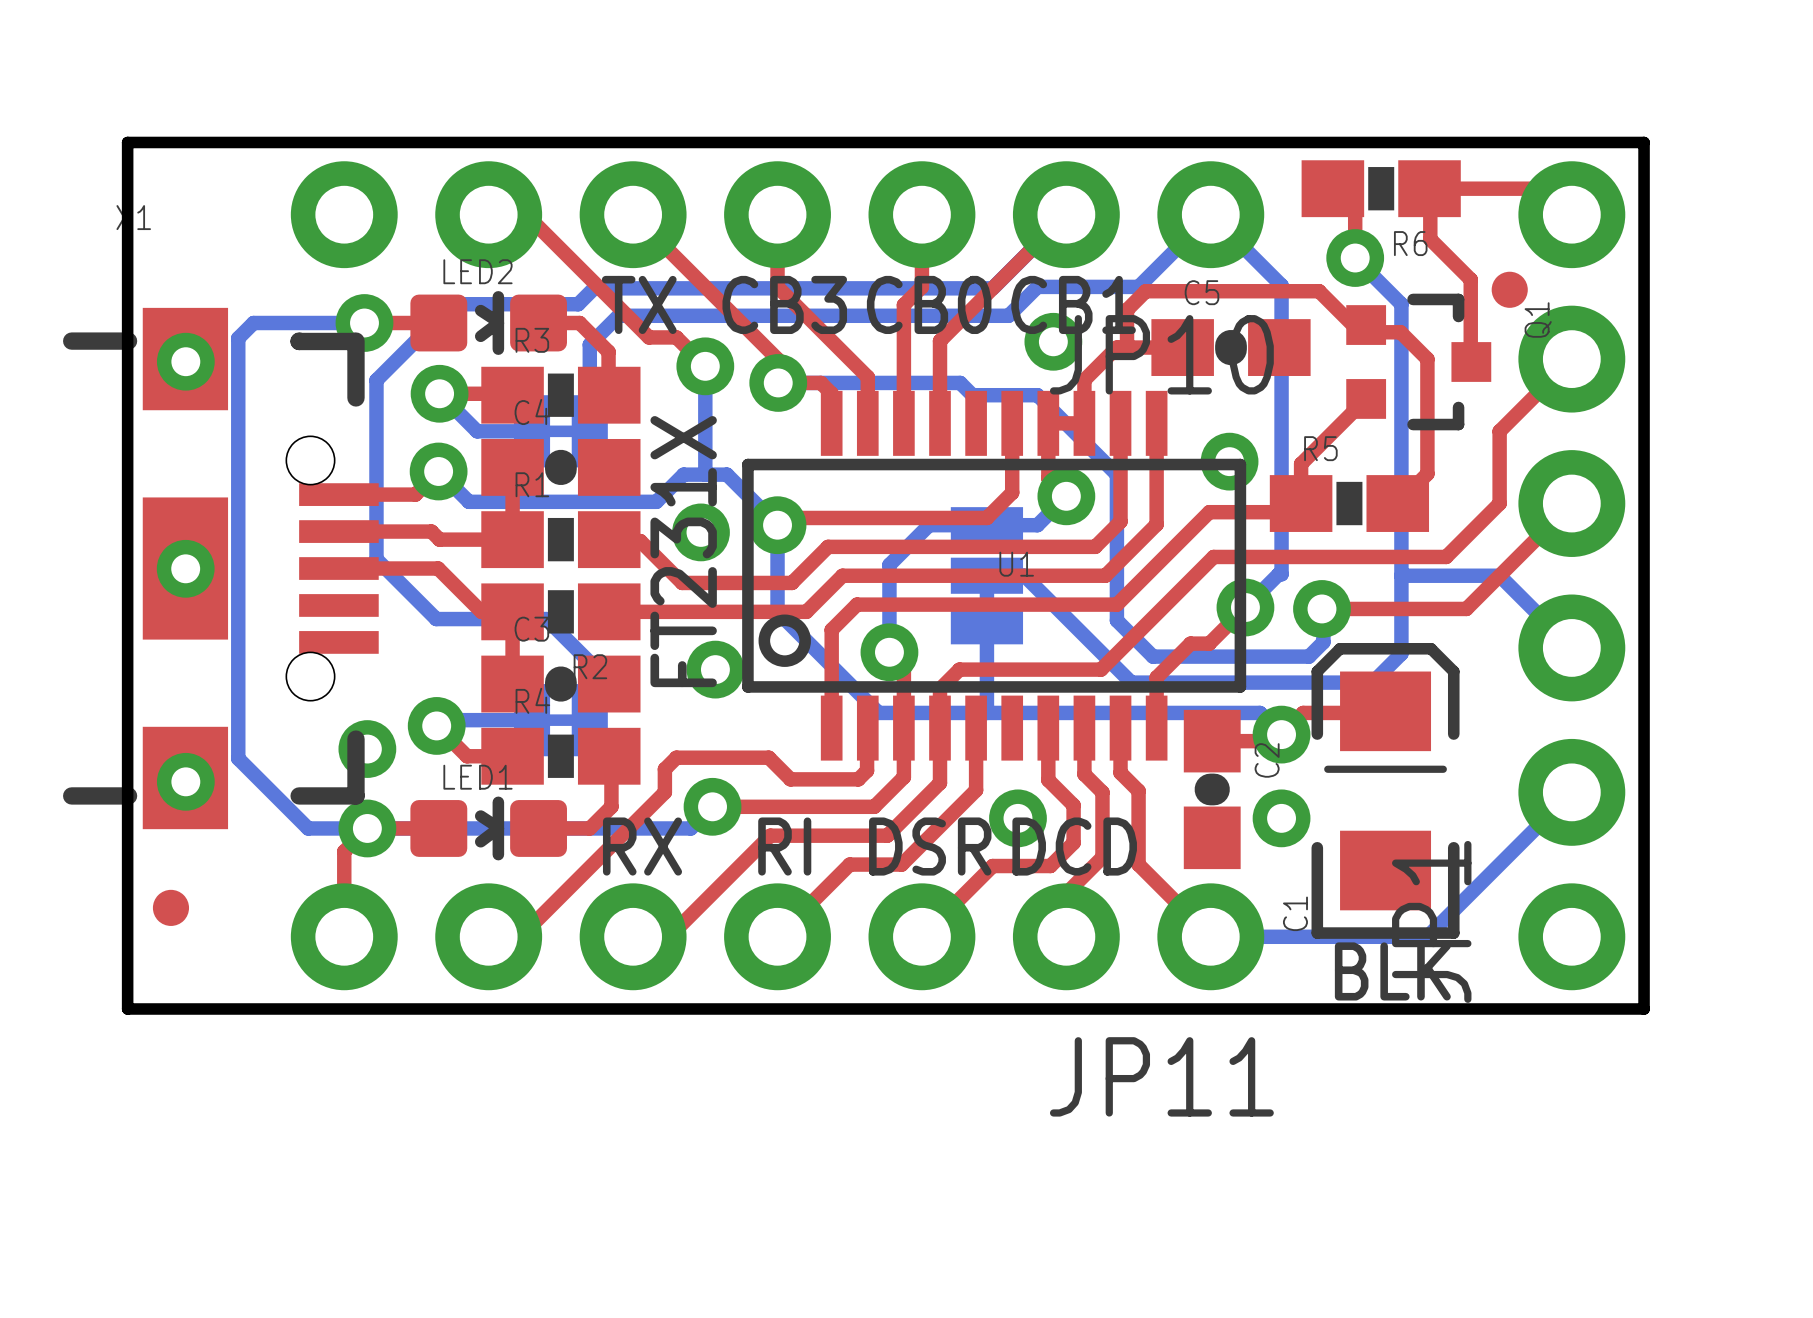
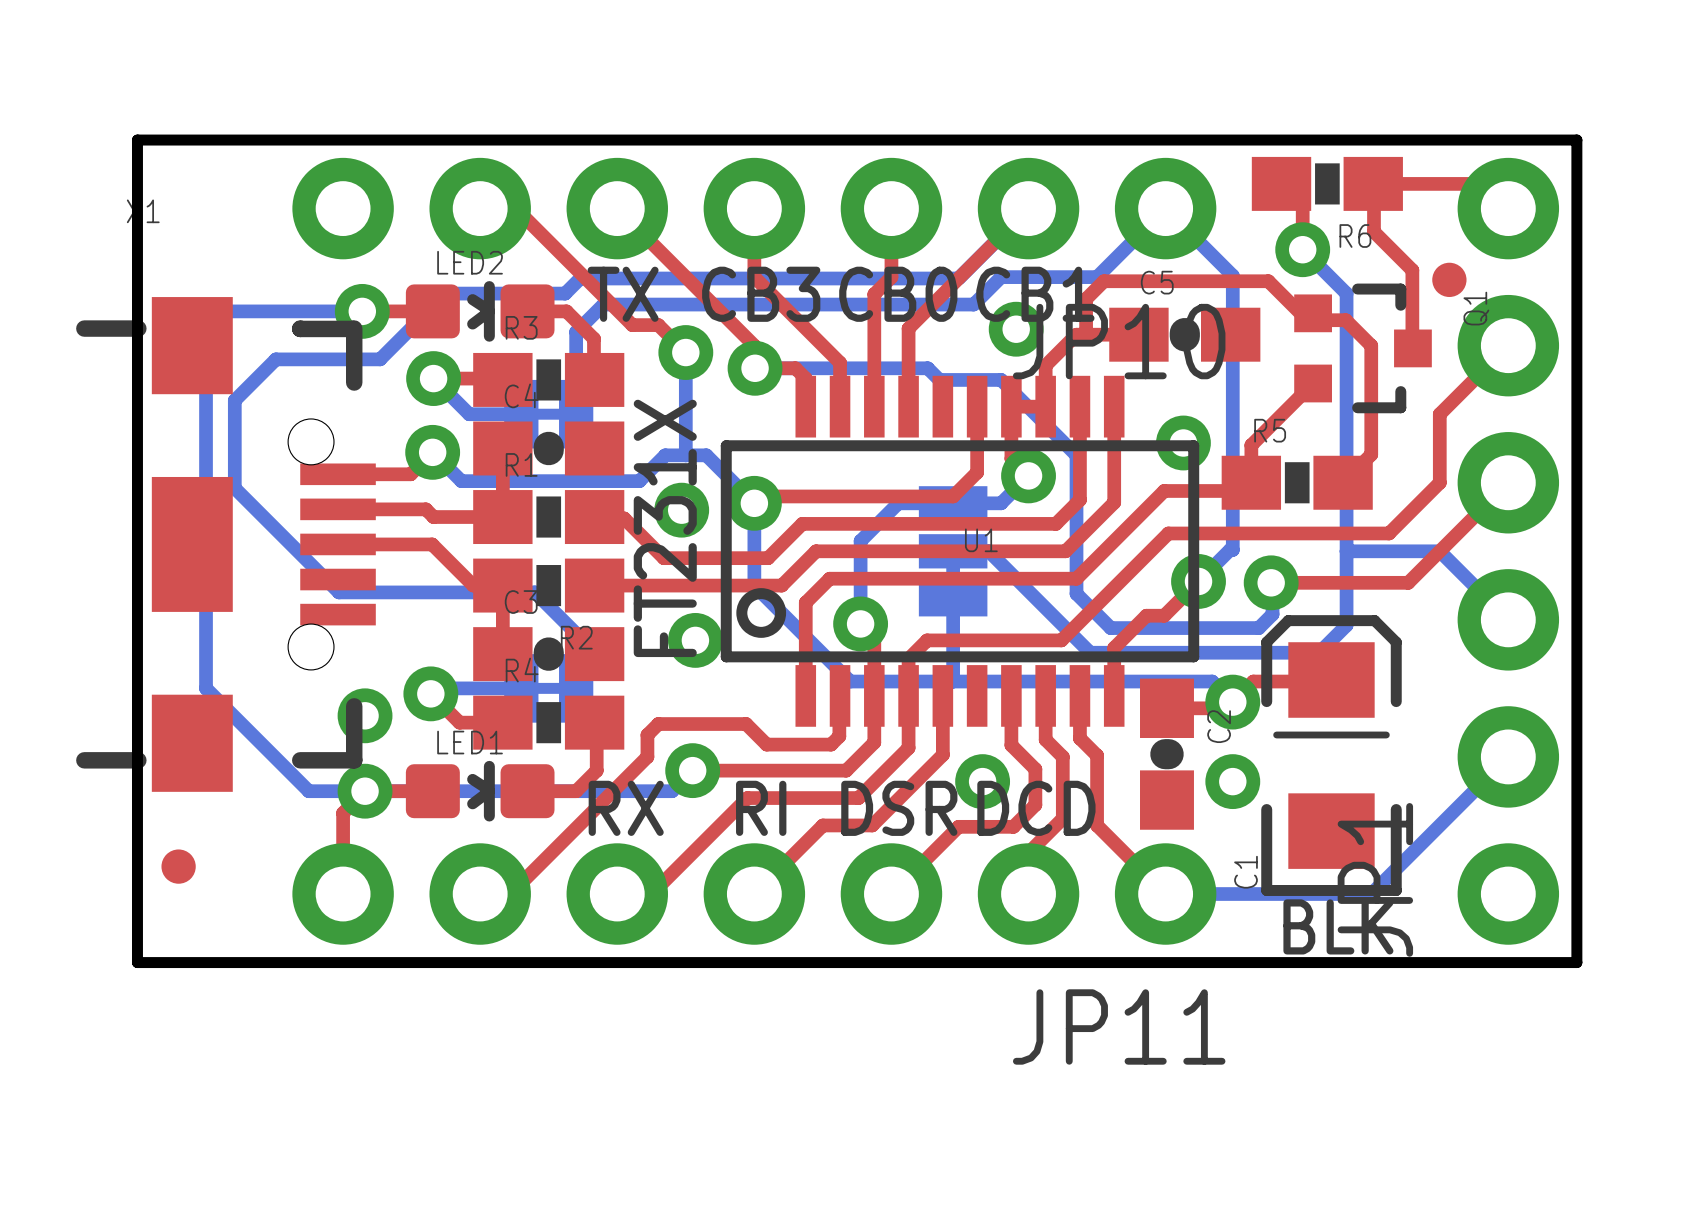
bottom track: (253, 323) (238, 338) (238, 758) -> (257, 311) (227, 311) (206, 333) (206, 688) (242, 724)
via: (185, 361) -> none
bottom track: (383, 373) (376, 380) (376, 559) (436, 619) -> (380, 359) (275, 359) (234, 400) (234, 488) (338, 592) (430, 592)
via: (185, 568) -> none
via: (185, 781) -> none

